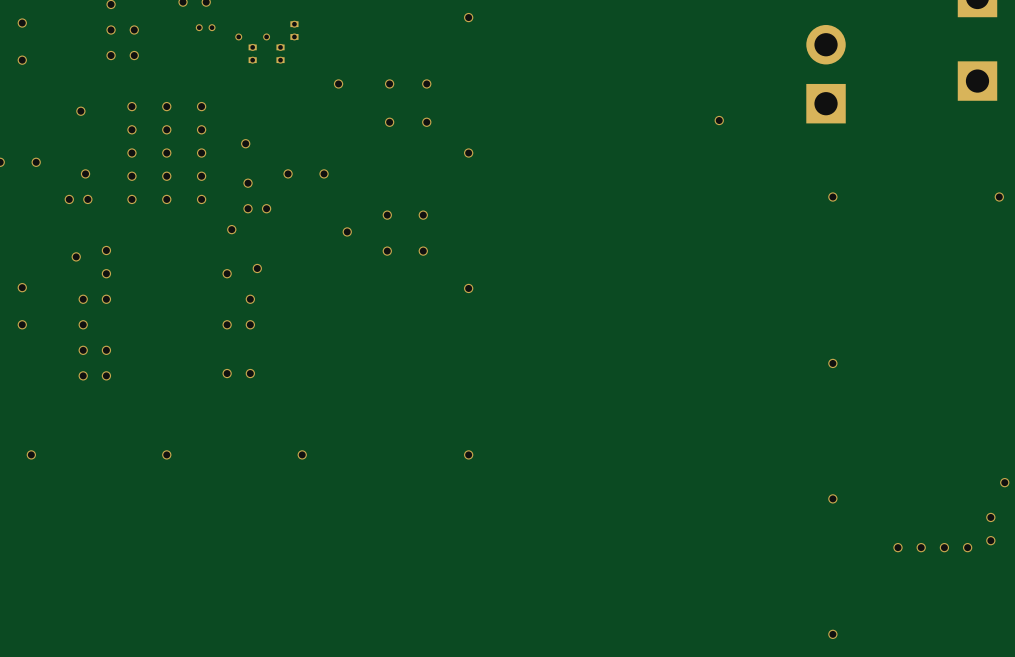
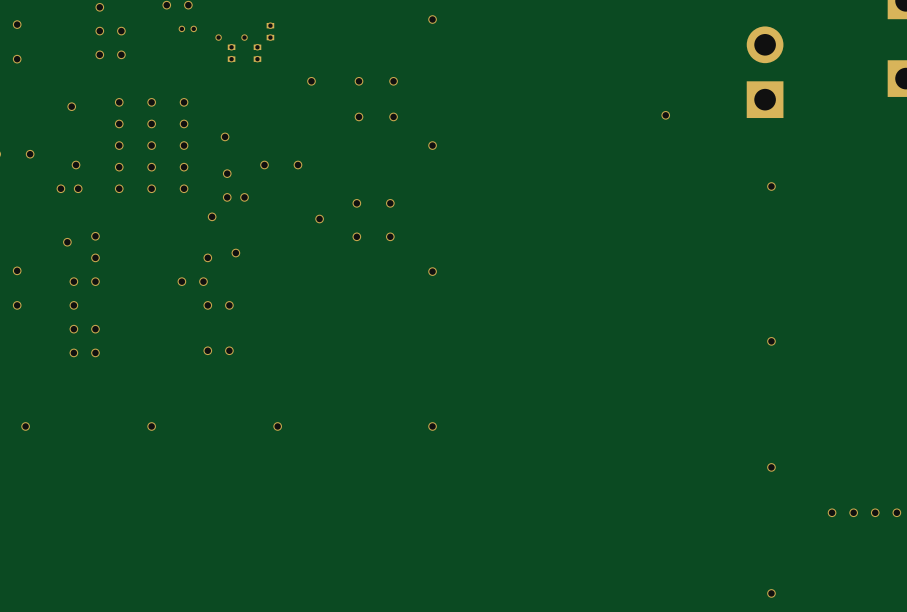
via: none -> (181, 281)
via: none -> (203, 281)
via: (250, 299) -> none

